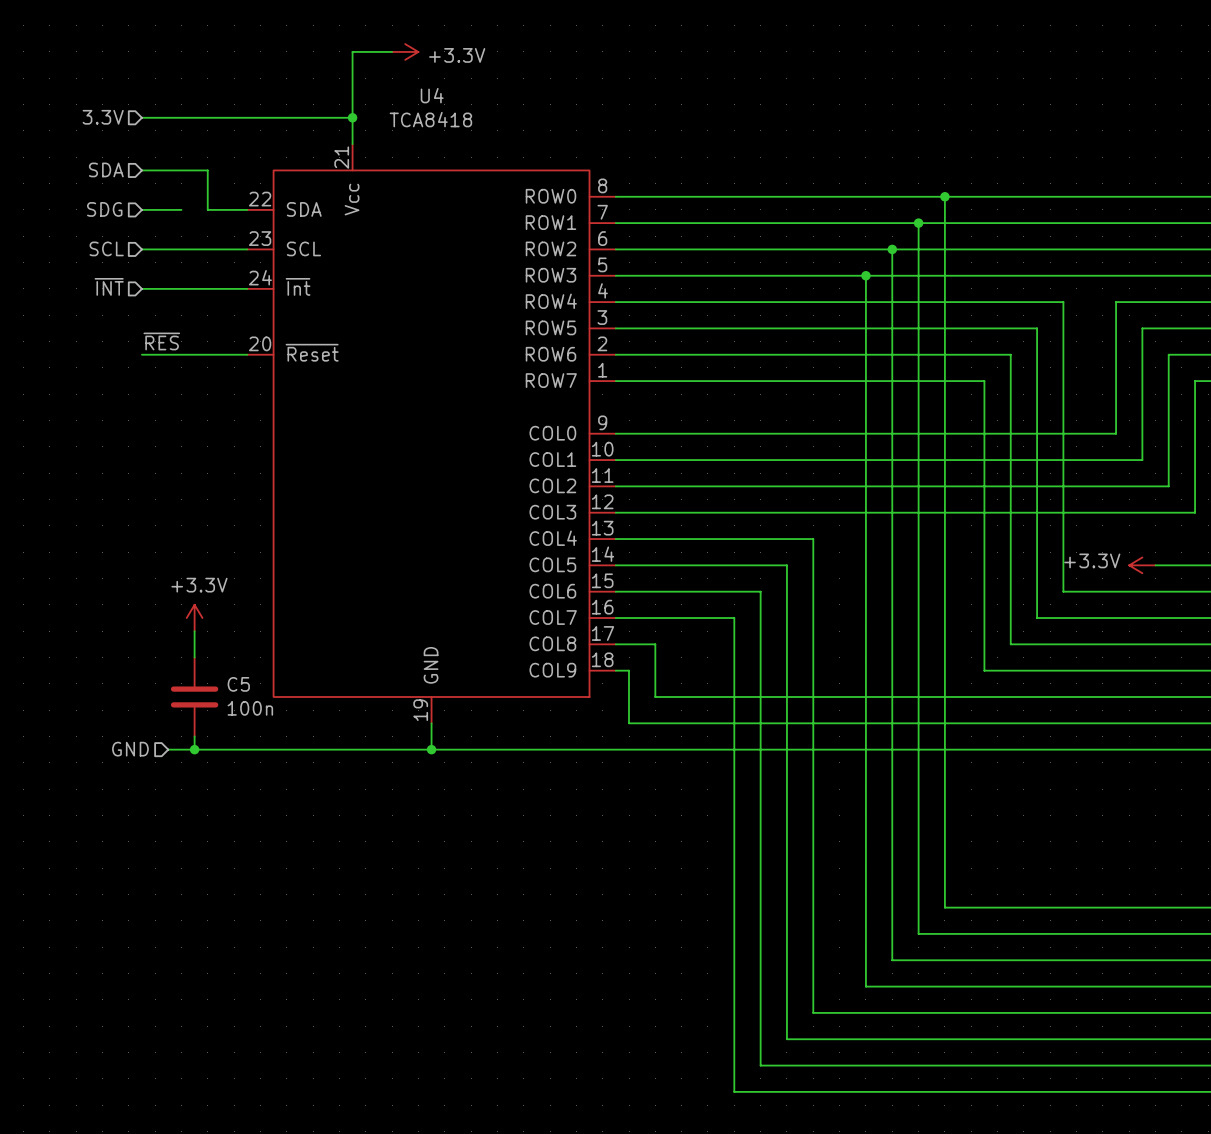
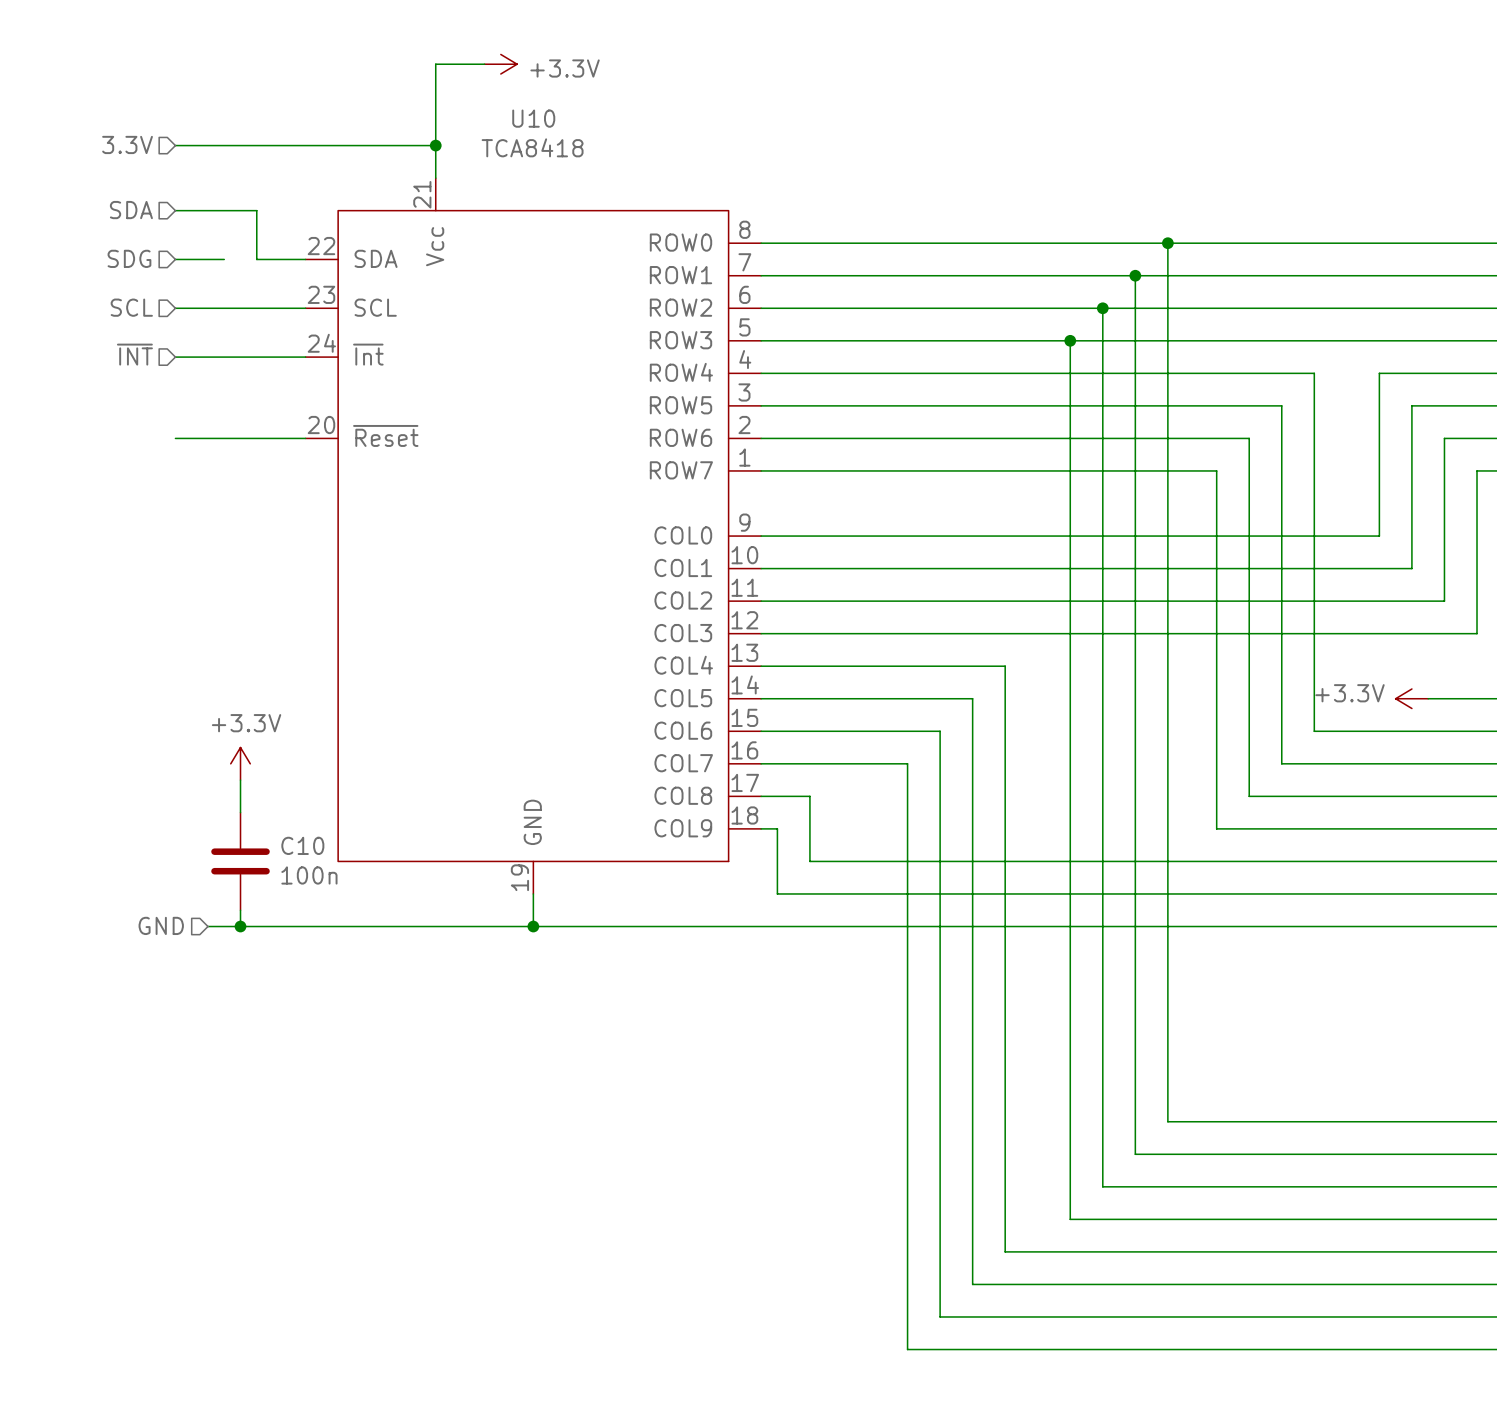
U4 name: U4 (432, 95) -> U10 (533, 118)
label: ~{RES} (161, 341) -> none
C5 name: C5 (238, 684) -> C10 (302, 845)

